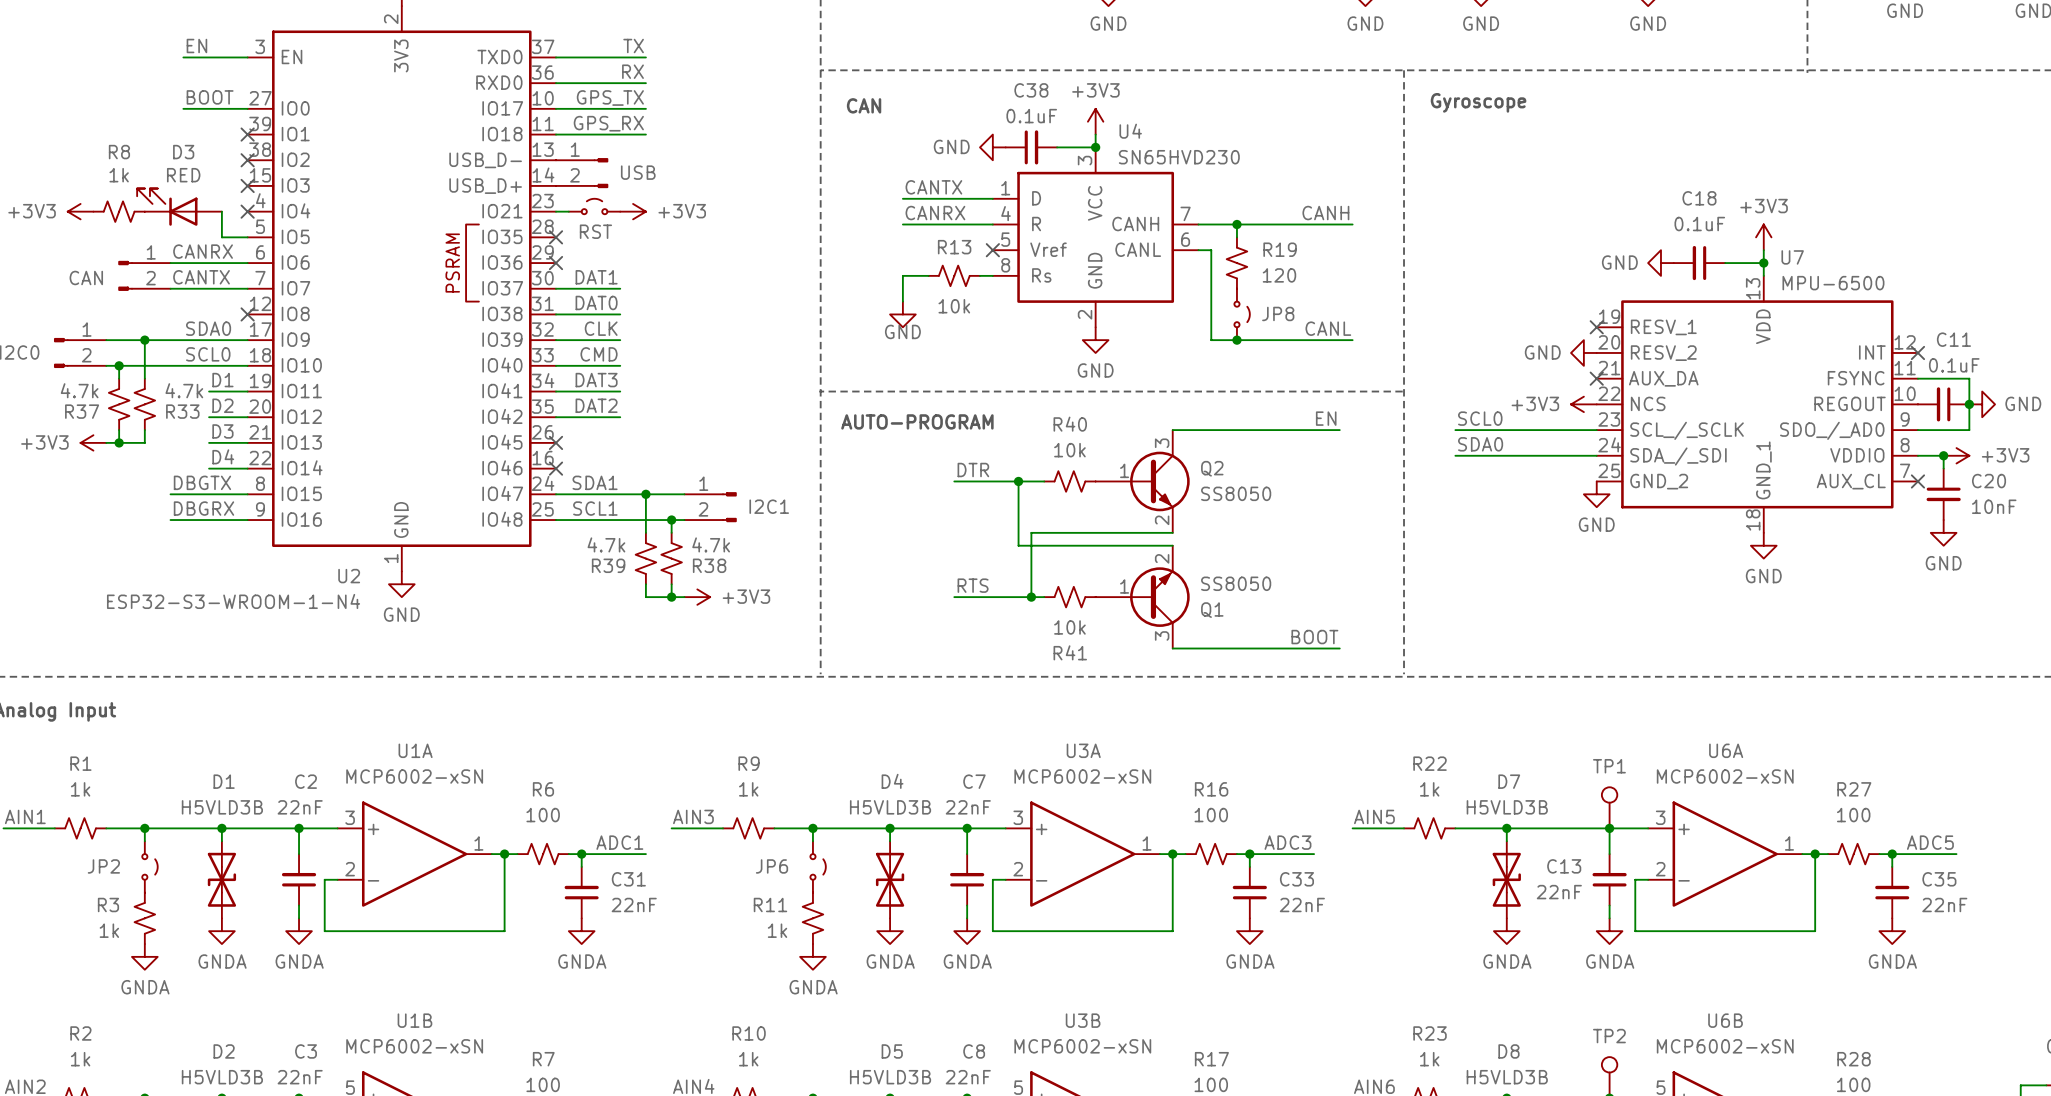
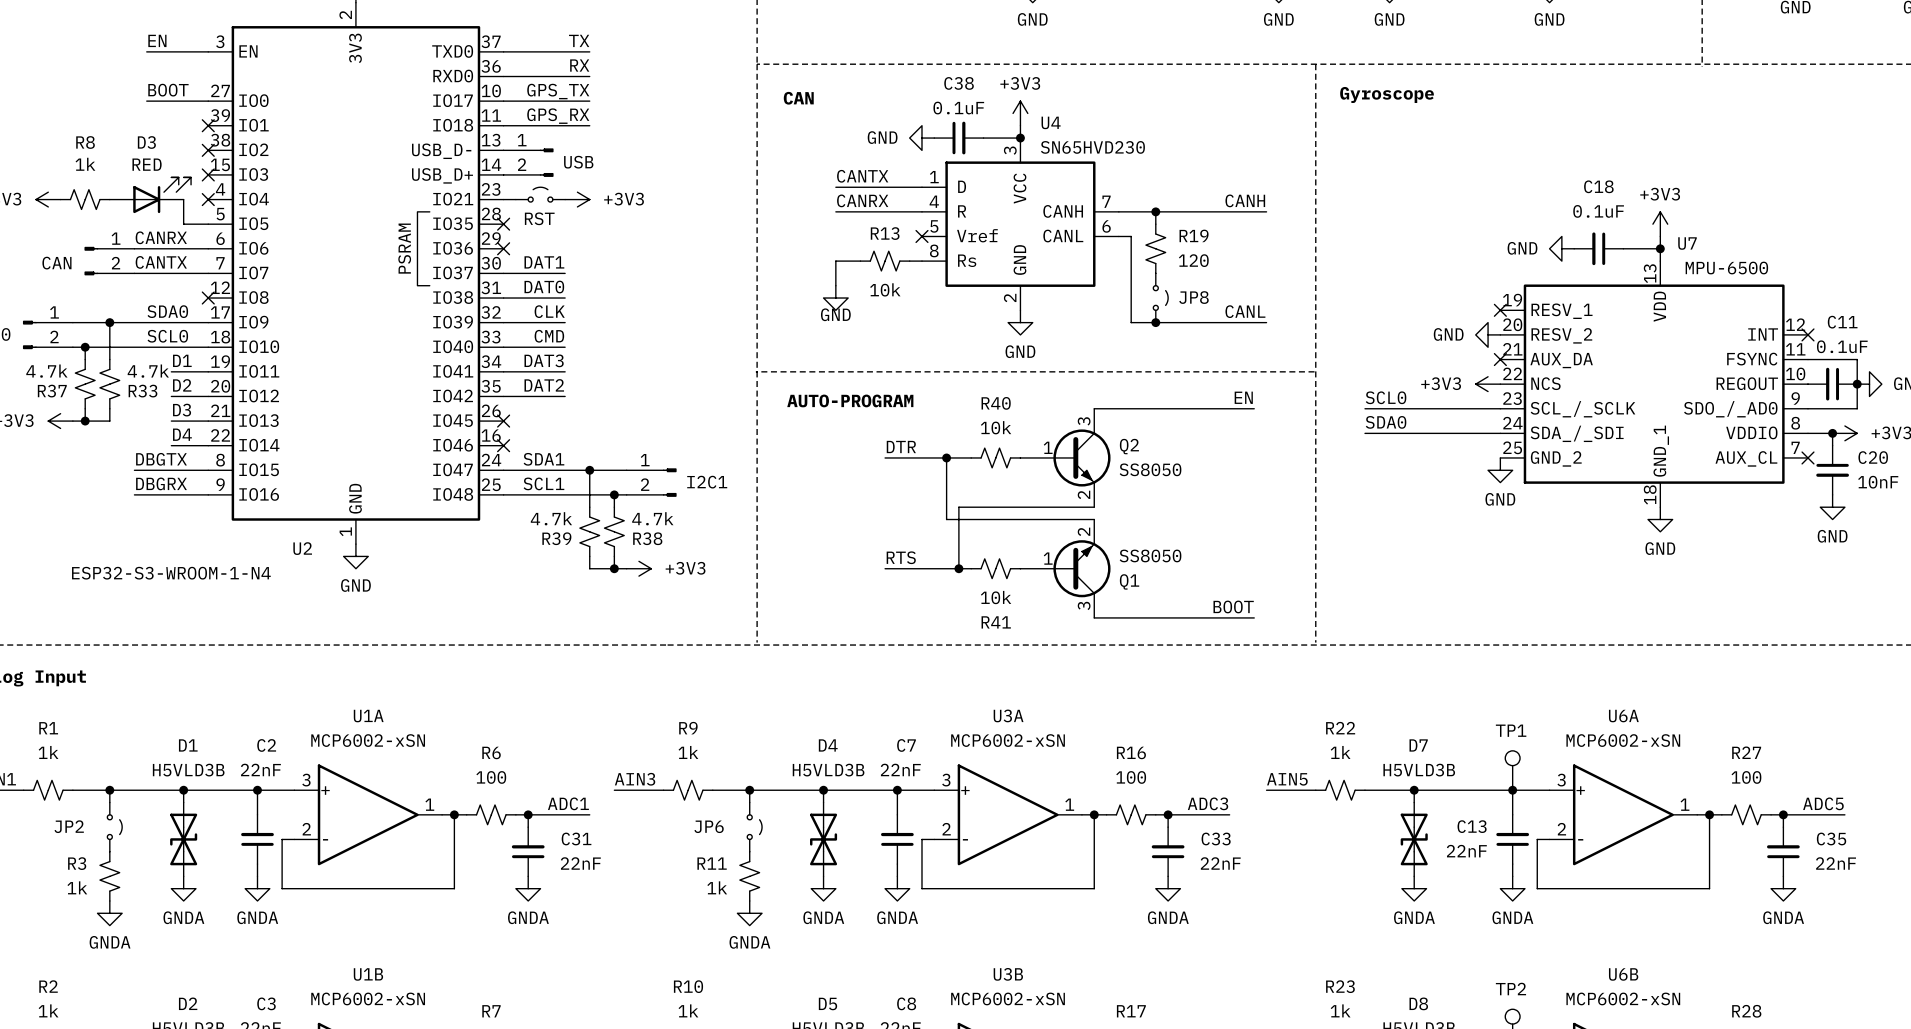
D3 flip: as is (167, 207) -> left-right (162, 195)

